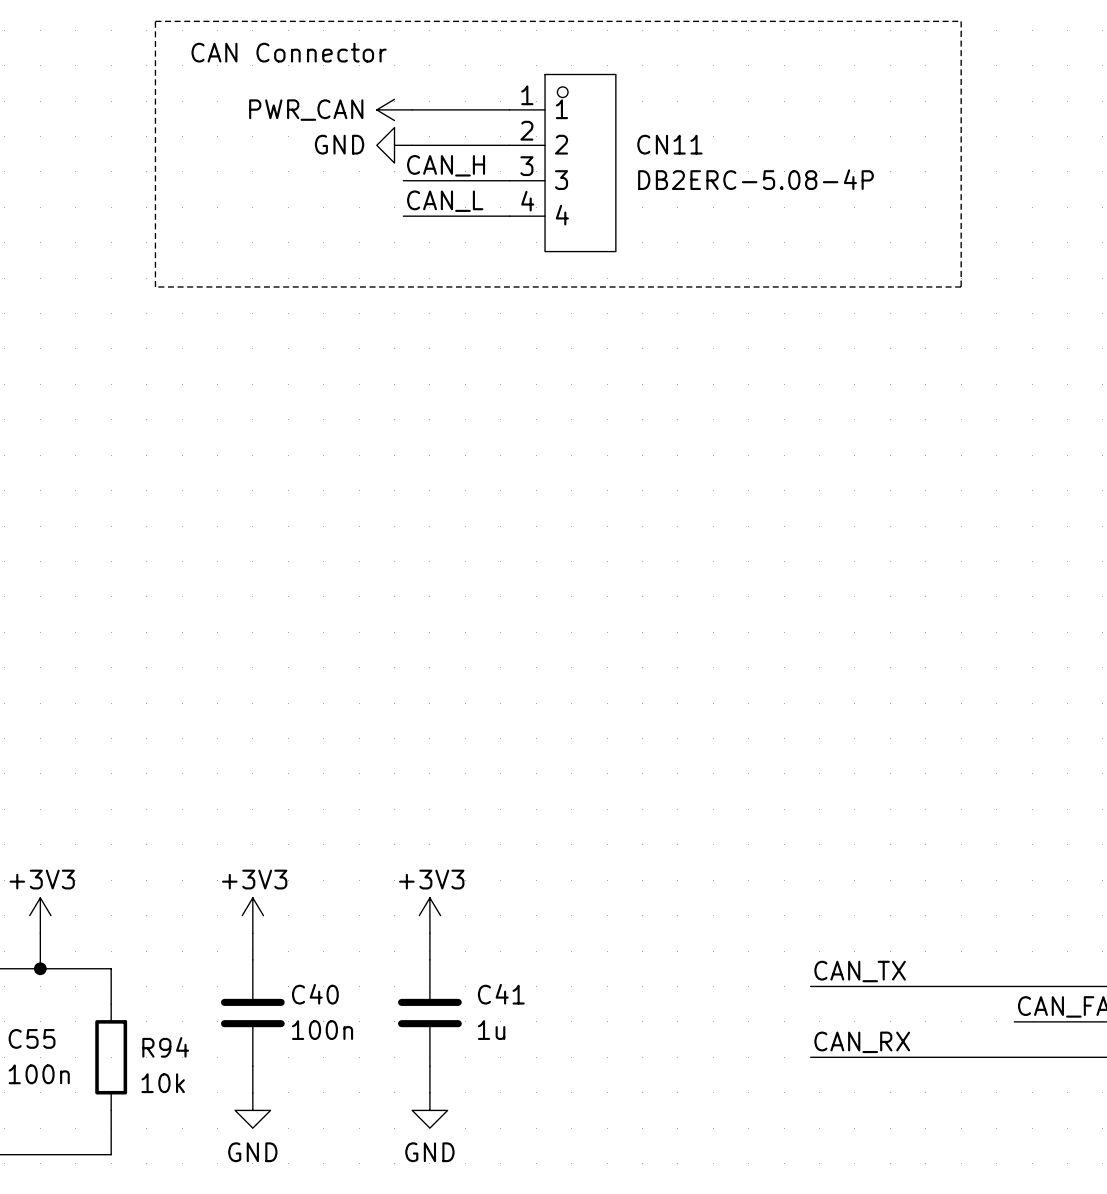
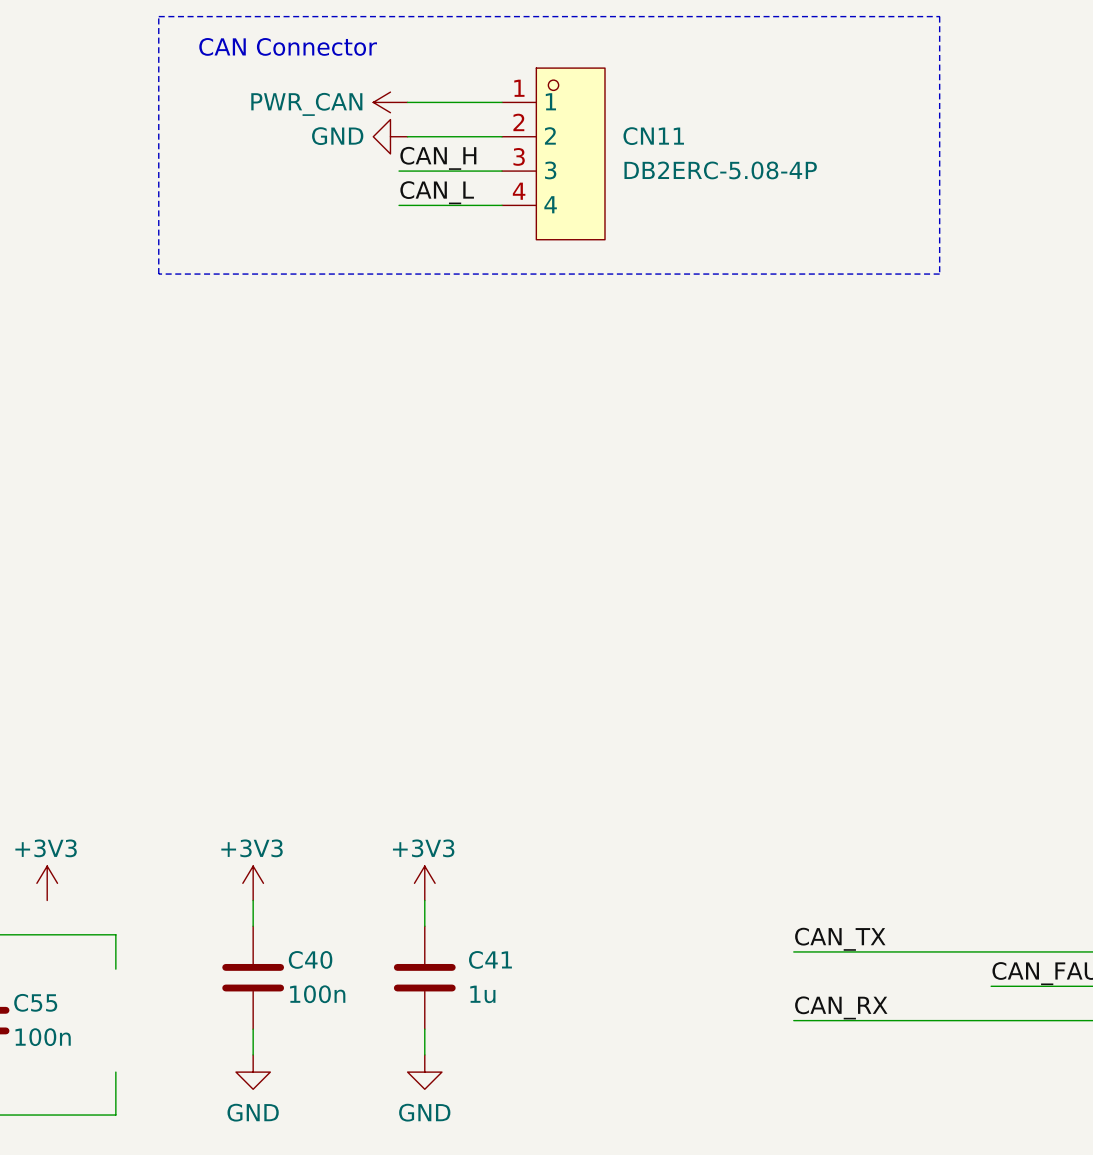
wire: (40, 933) (40, 968) -> none
junction: (40, 968) -> none
R94: 10k (111, 1057) -> none

